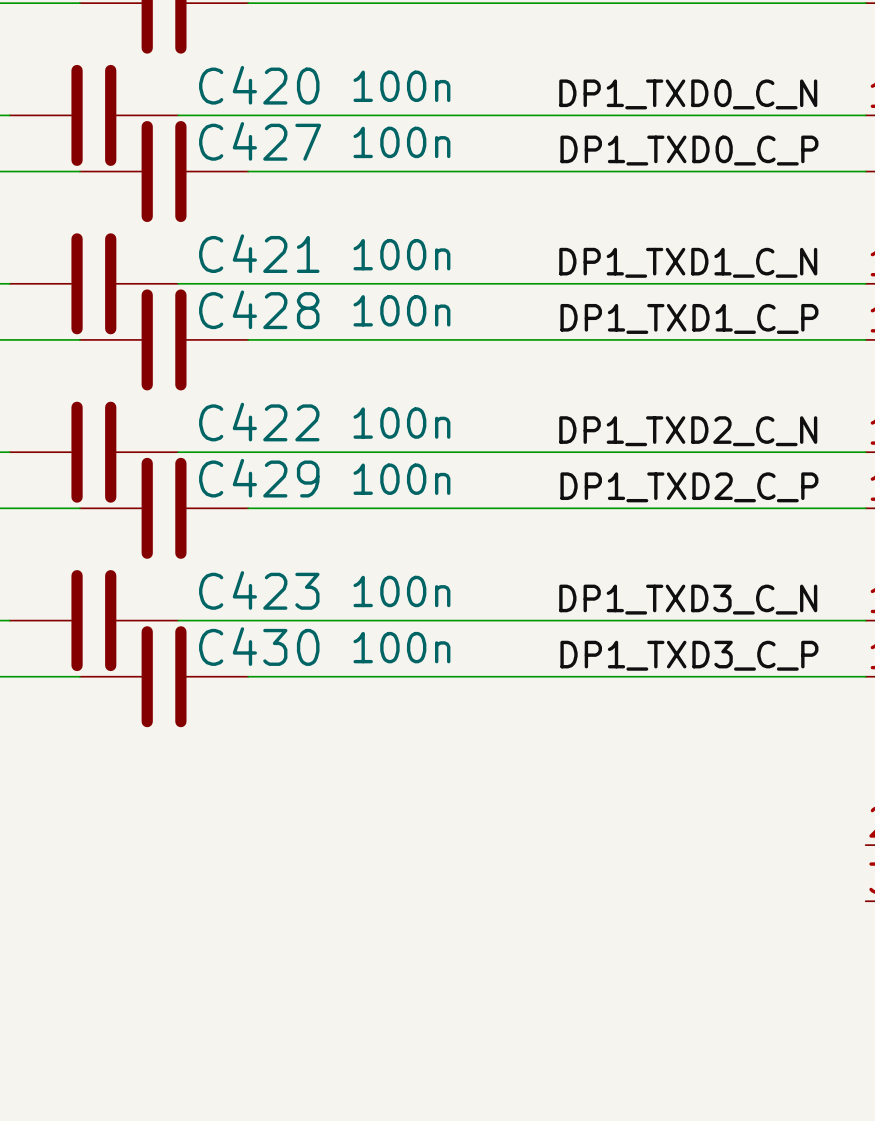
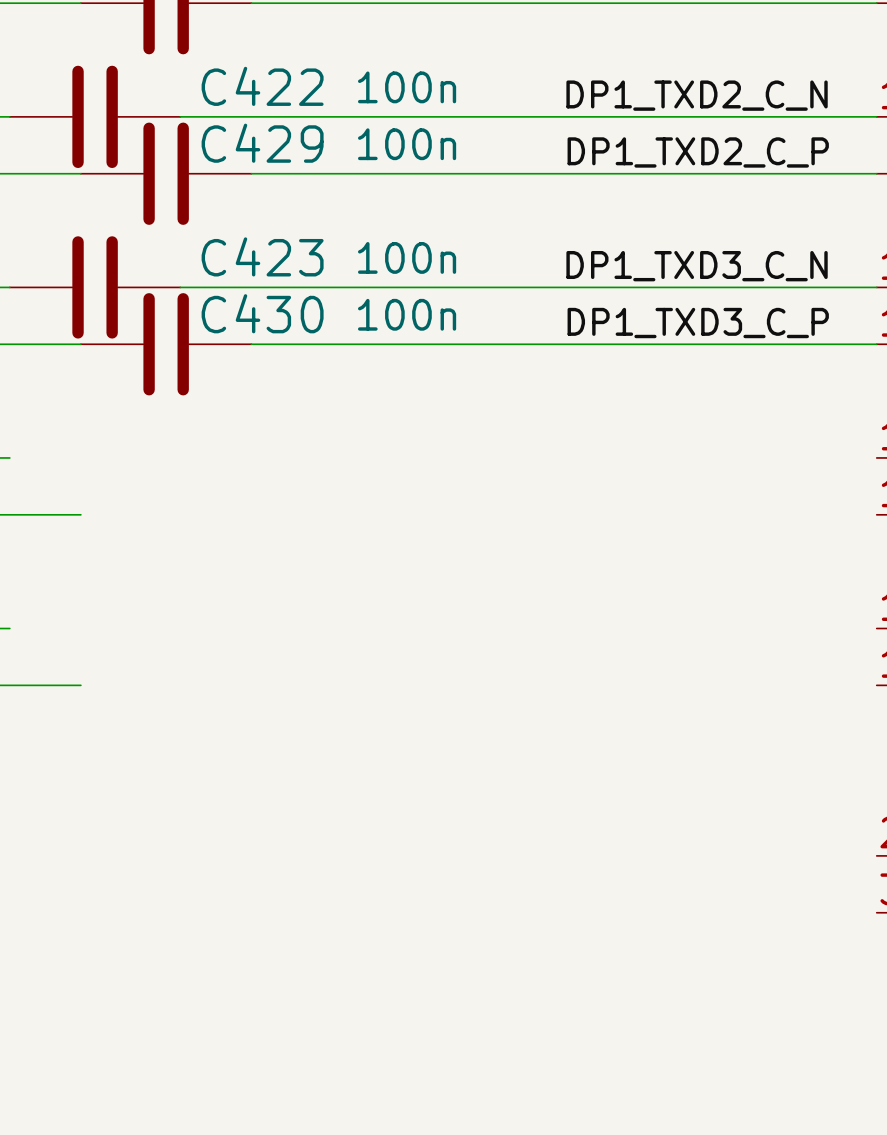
C420 name: C420 (259, 85) -> C422 (262, 86)
label: DP1_TXD0_C_N (688, 94) -> DP1_TXD2_C_N (697, 95)
C427 name: C427 (260, 141) -> C429 (262, 143)
label: DP1_TXD0_C_P (689, 150) -> DP1_TXD2_C_P (698, 152)
C421 name: C421 (259, 253) -> C423 (262, 256)
label: DP1_TXD1_C_N (688, 262) -> DP1_TXD3_C_N (697, 266)
C428 name: C428 (259, 309) -> C430 (262, 313)
label: DP1_TXD1_C_P (689, 318) -> DP1_TXD3_C_P (698, 323)
label: DP1_TXD2_C_N (688, 431) -> none
C422: (93, 452) -> none
wire: (178, 452) (865, 452) -> none
label: DP1_TXD2_C_P (689, 487) -> none
C429: (164, 508) -> none
wire: (248, 508) (865, 508) -> none
label: DP1_TXD3_C_N (688, 599) -> none
C423: (93, 620) -> none
wire: (178, 620) (865, 620) -> none
label: DP1_TXD3_C_P (689, 655) -> none
C430: (164, 676) -> none
wire: (248, 676) (865, 676) -> none

